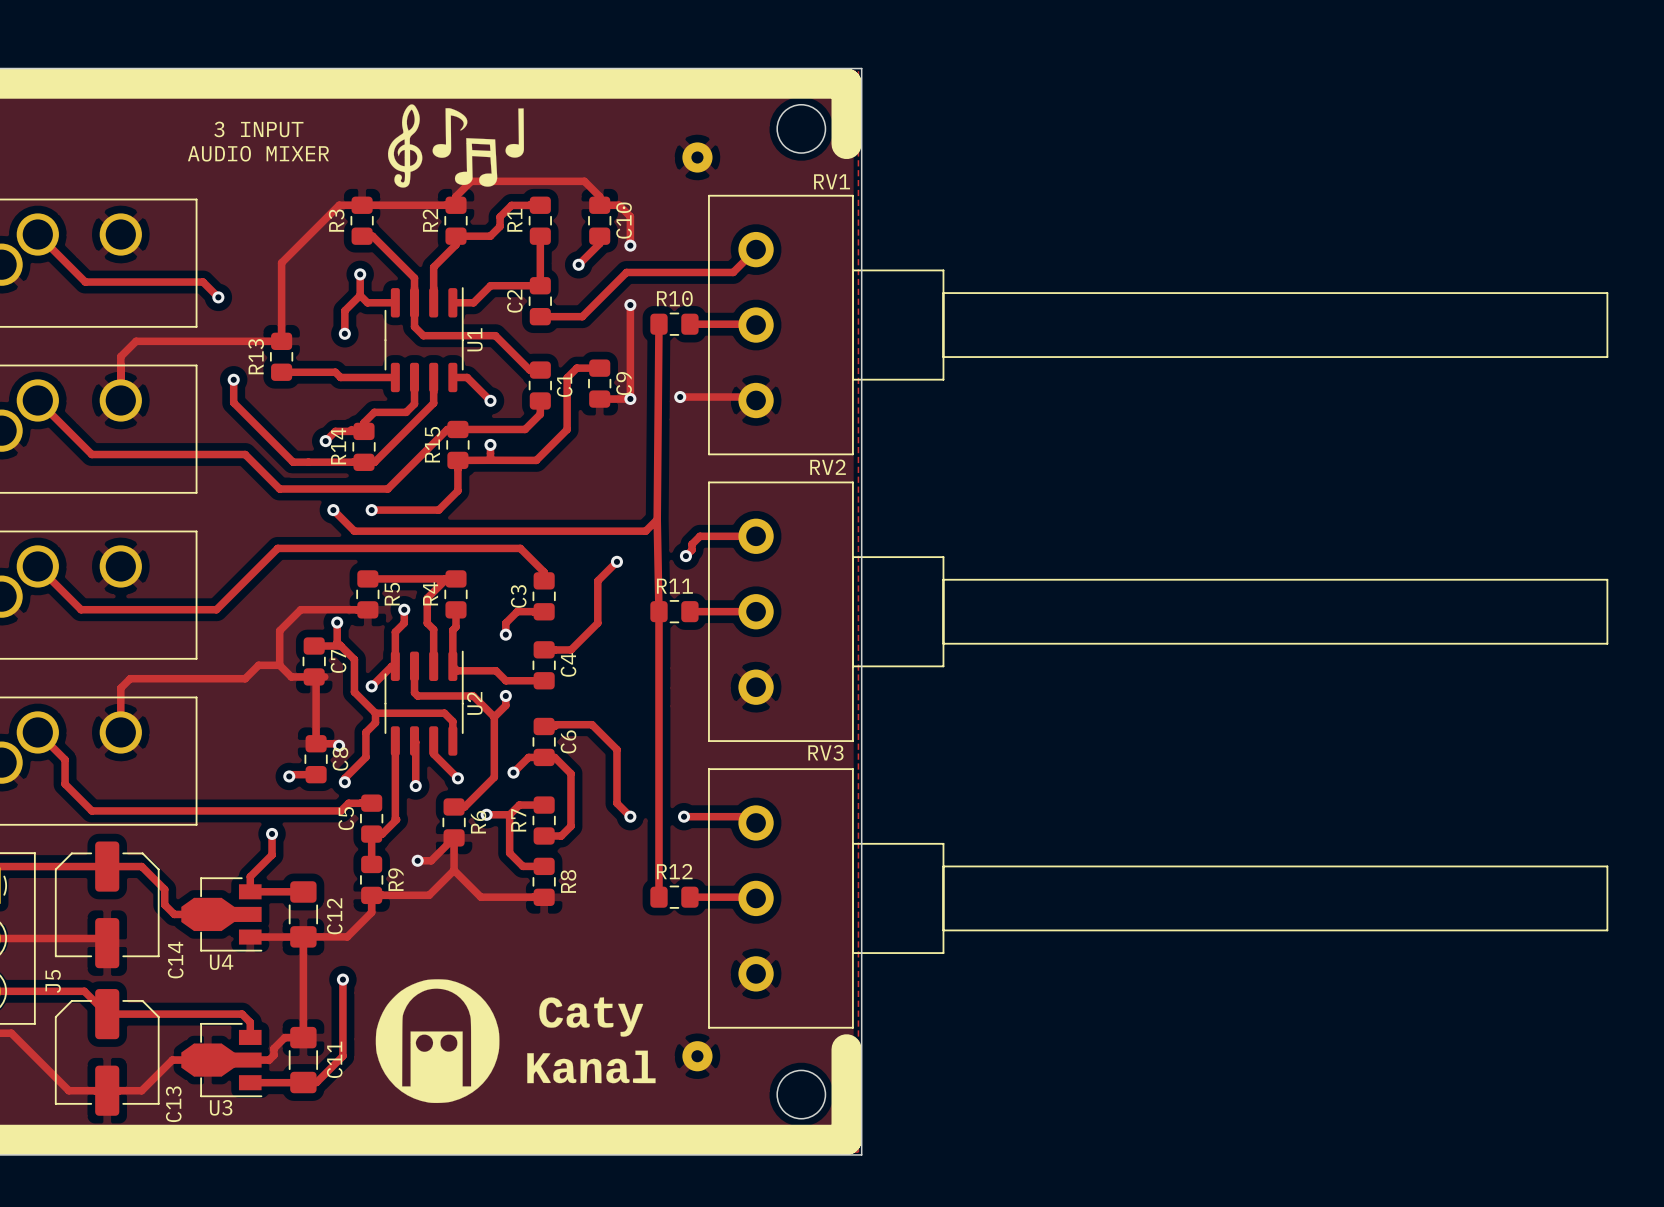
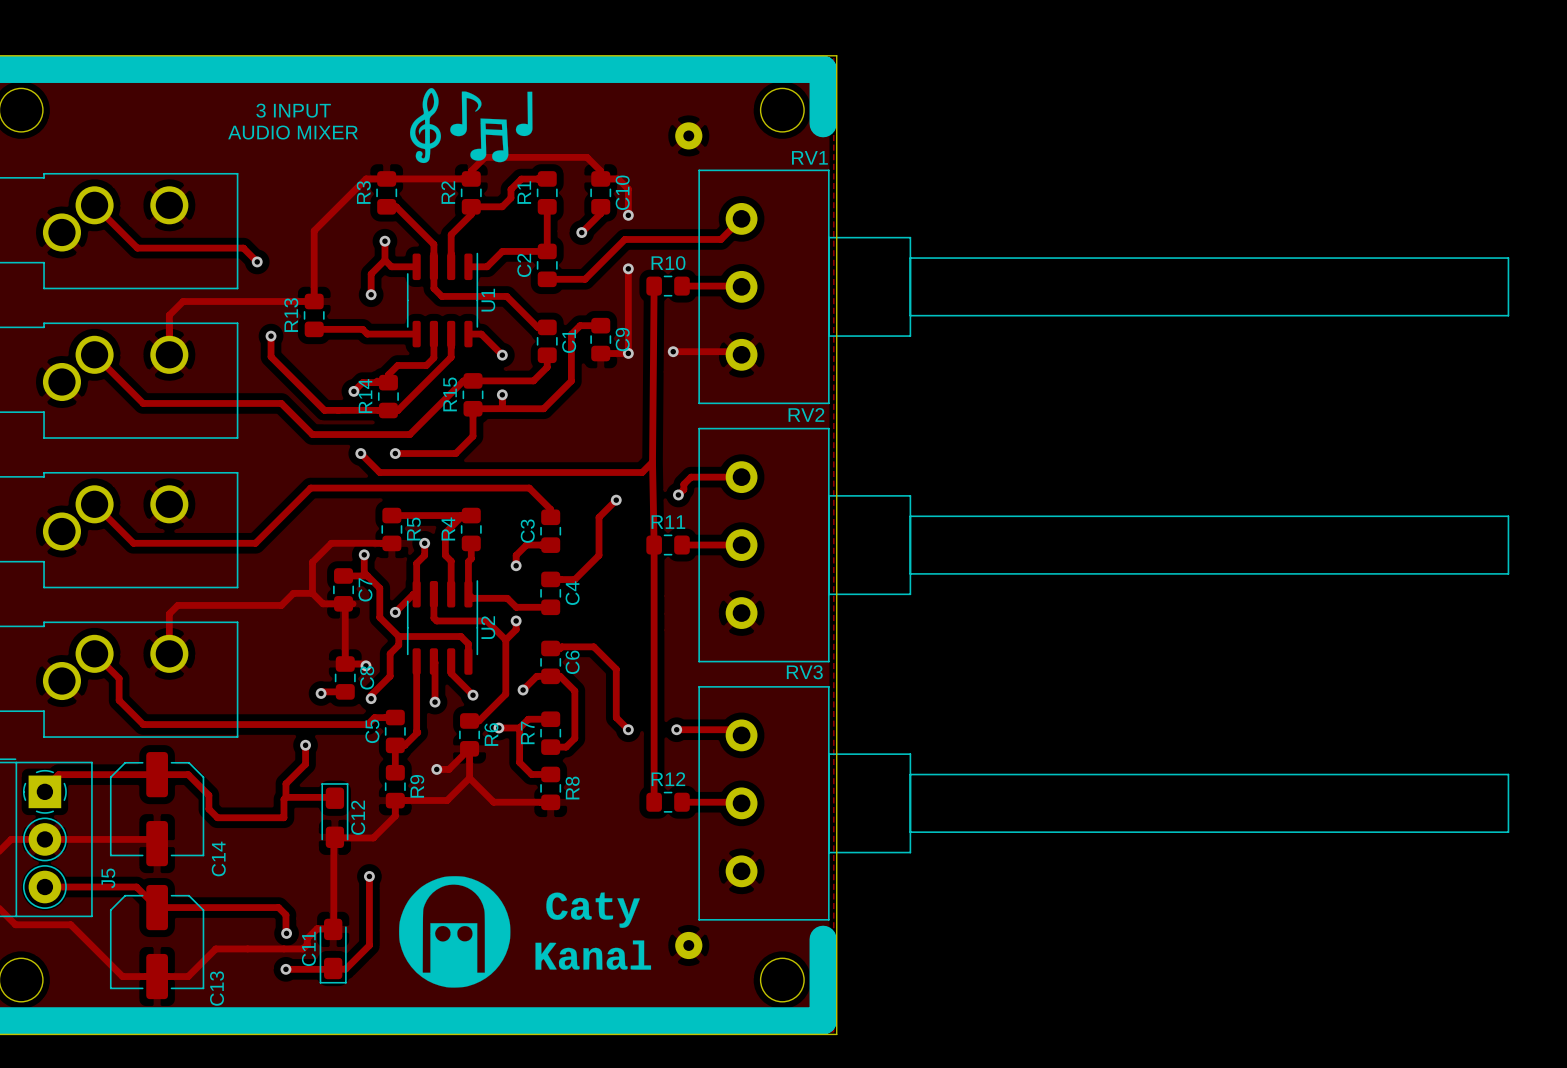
C12 footprint: [288, 881, 319, 948] -> [321, 783, 349, 849]
track: none -> (285, 797) (283, 799) (283, 817)
U4: (221, 914) -> none
track: (250, 937) (303, 937) -> none
C11 footprint: [288, 1026, 319, 1094] -> [319, 918, 347, 984]
via: none -> (286, 933)
C11 name position: C11 (334, 1059) -> C11 (308, 948)
U3: (221, 1060) -> none
via: none -> (285, 969)

